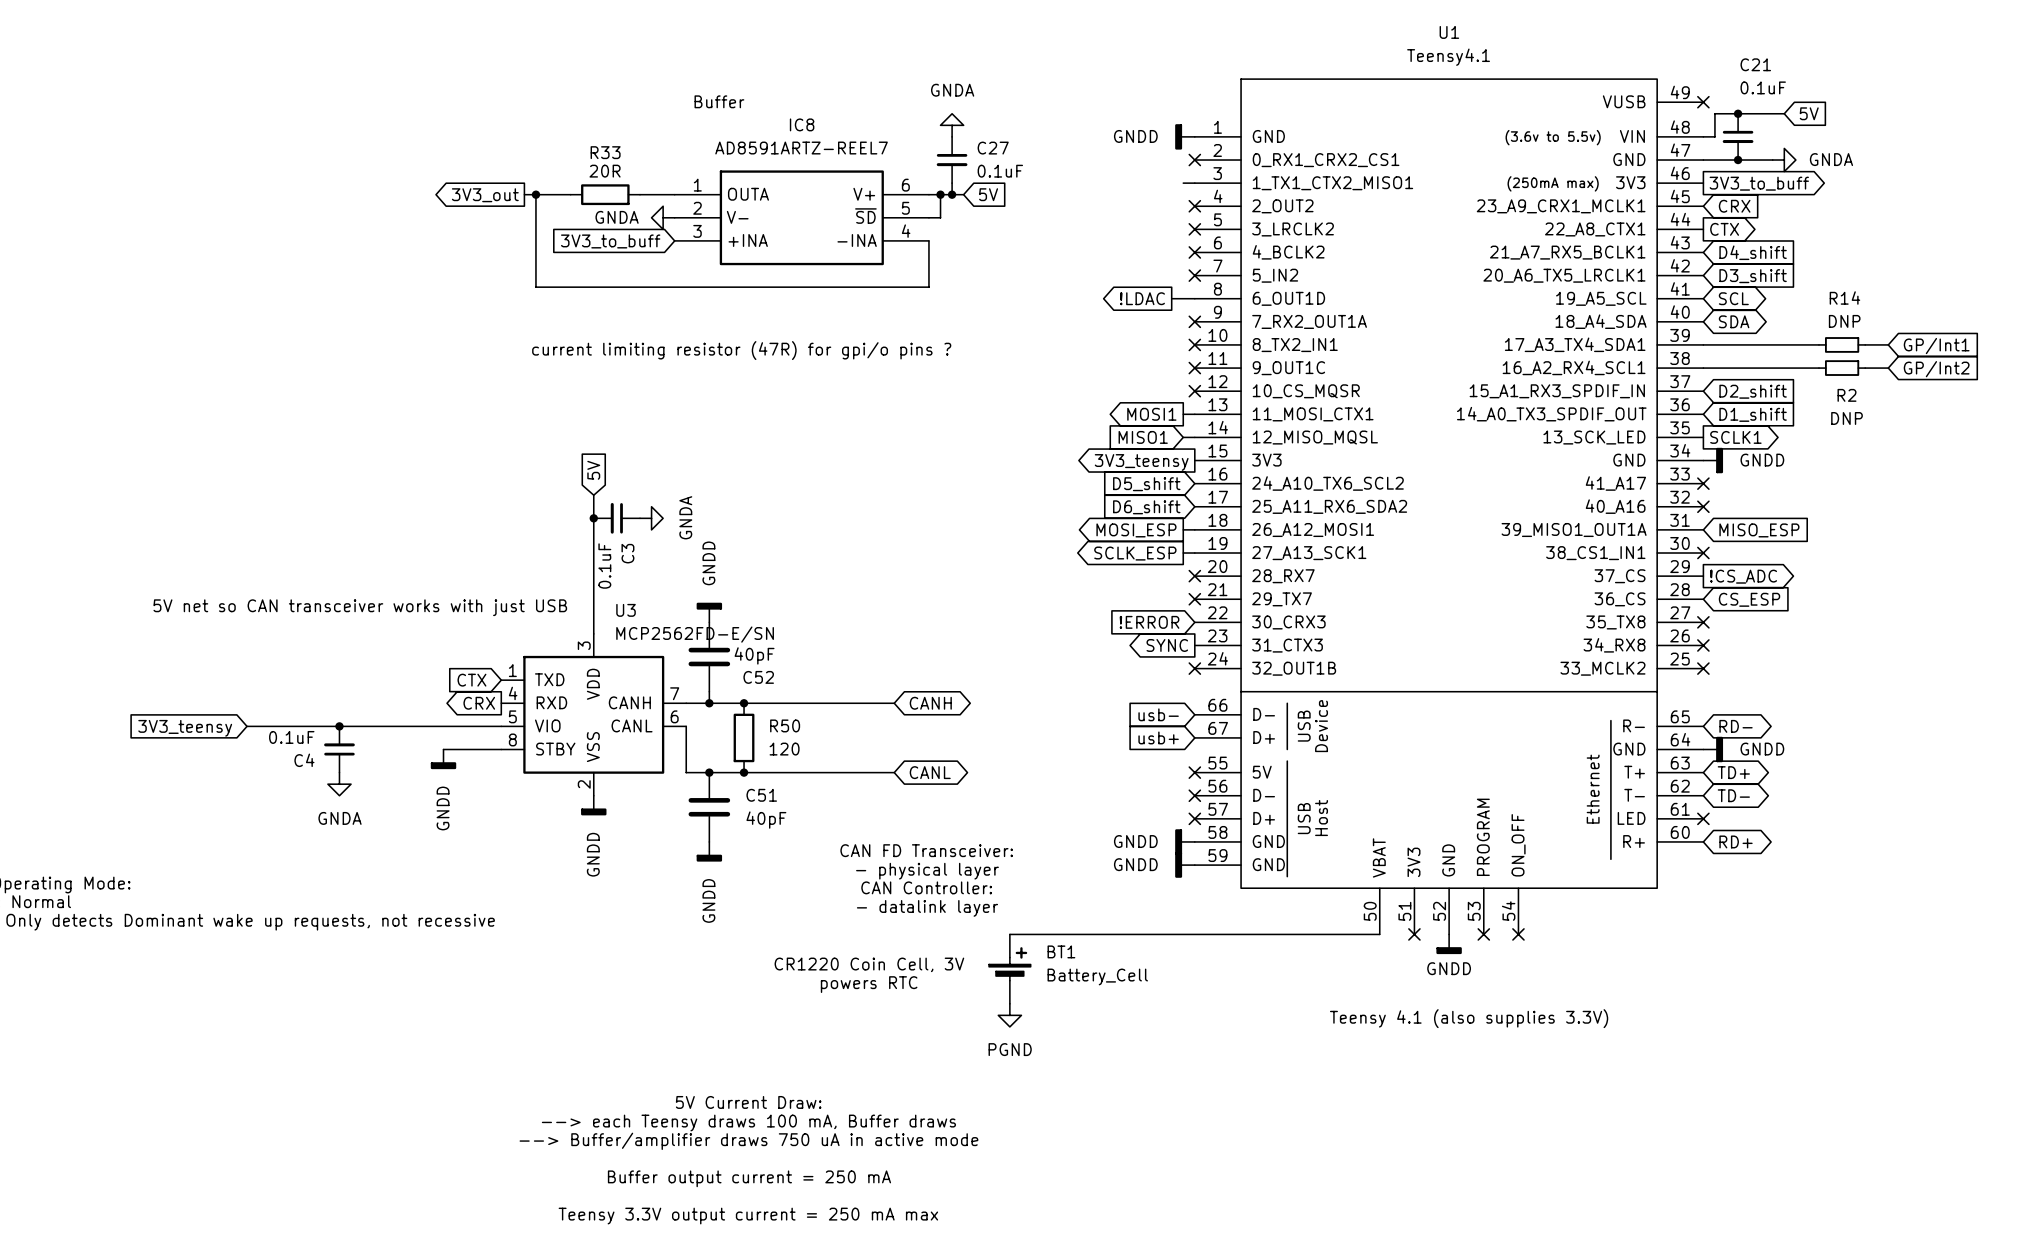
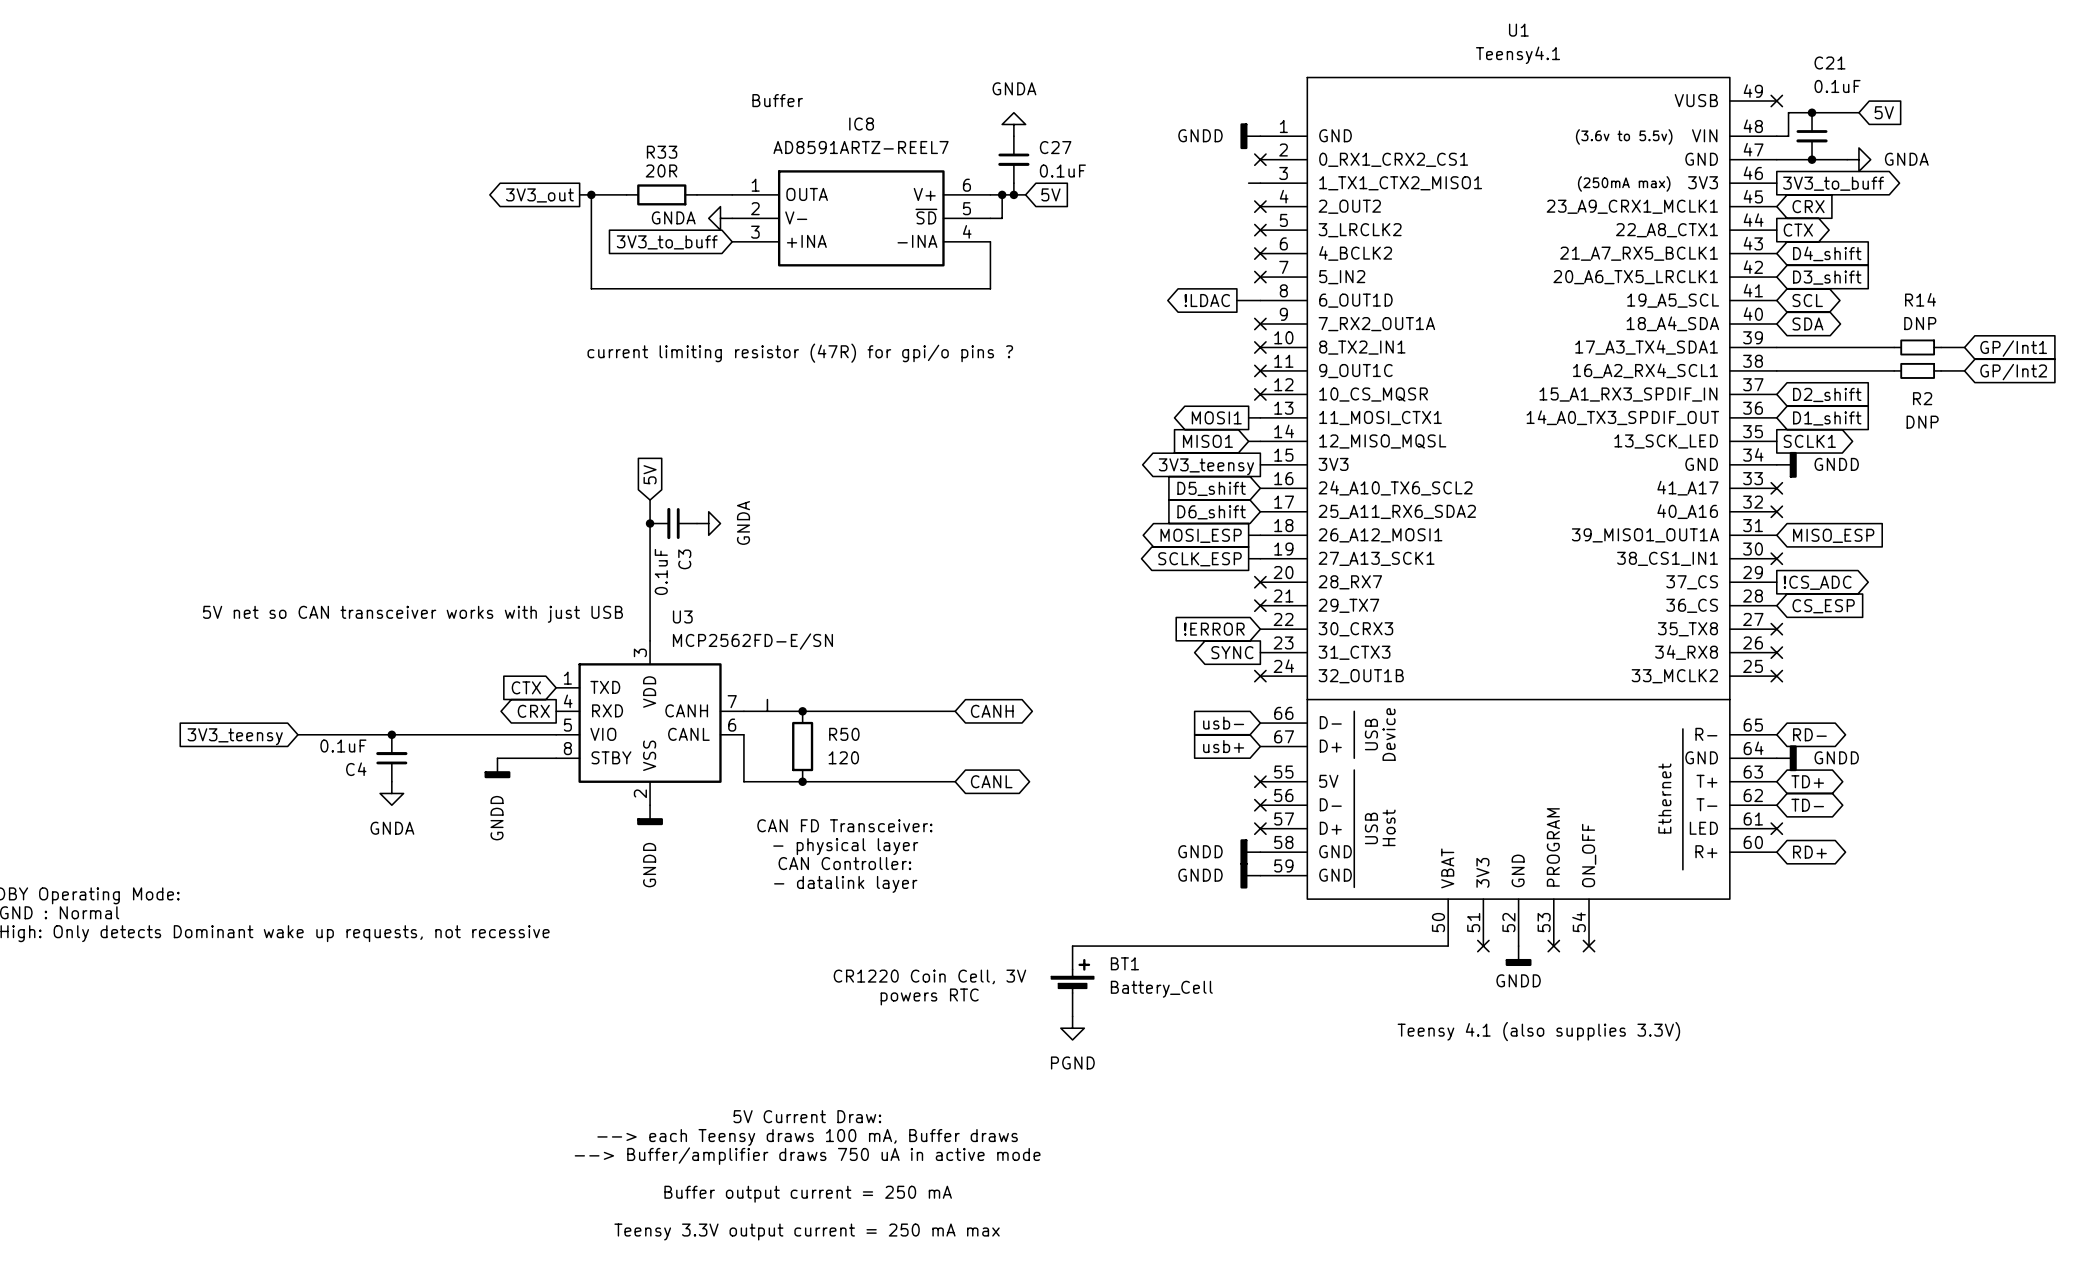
power symbol: GNDD (709, 612) -> none
C52: 40pF (709, 657) -> none
junction: (709, 703) -> none
junction: (709, 772) -> none
C51: 40pF (709, 807) -> none
text position: CAN FD Transceiver: (926, 850) -> CAN FD Transceiver: (844, 825)
power symbol: GNDD (709, 851) -> none
text position: - physical layer (927, 871) -> - physical layer (845, 846)
text position: CAN Controller: (926, 887) -> CAN Controller: (844, 863)
text position: - datalink layer (927, 908) -> - datalink layer (845, 884)

